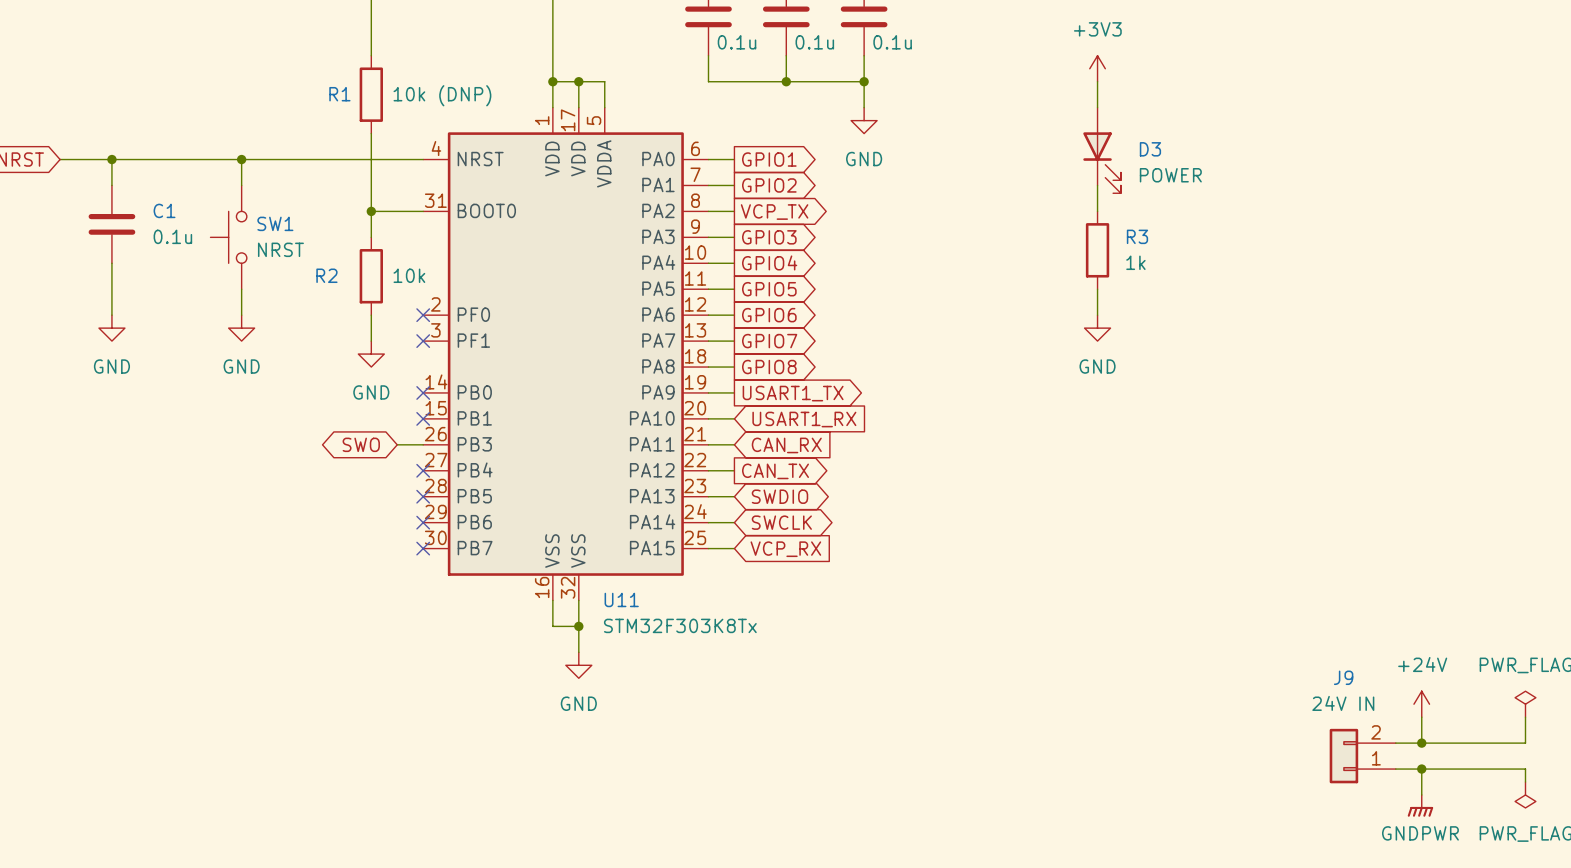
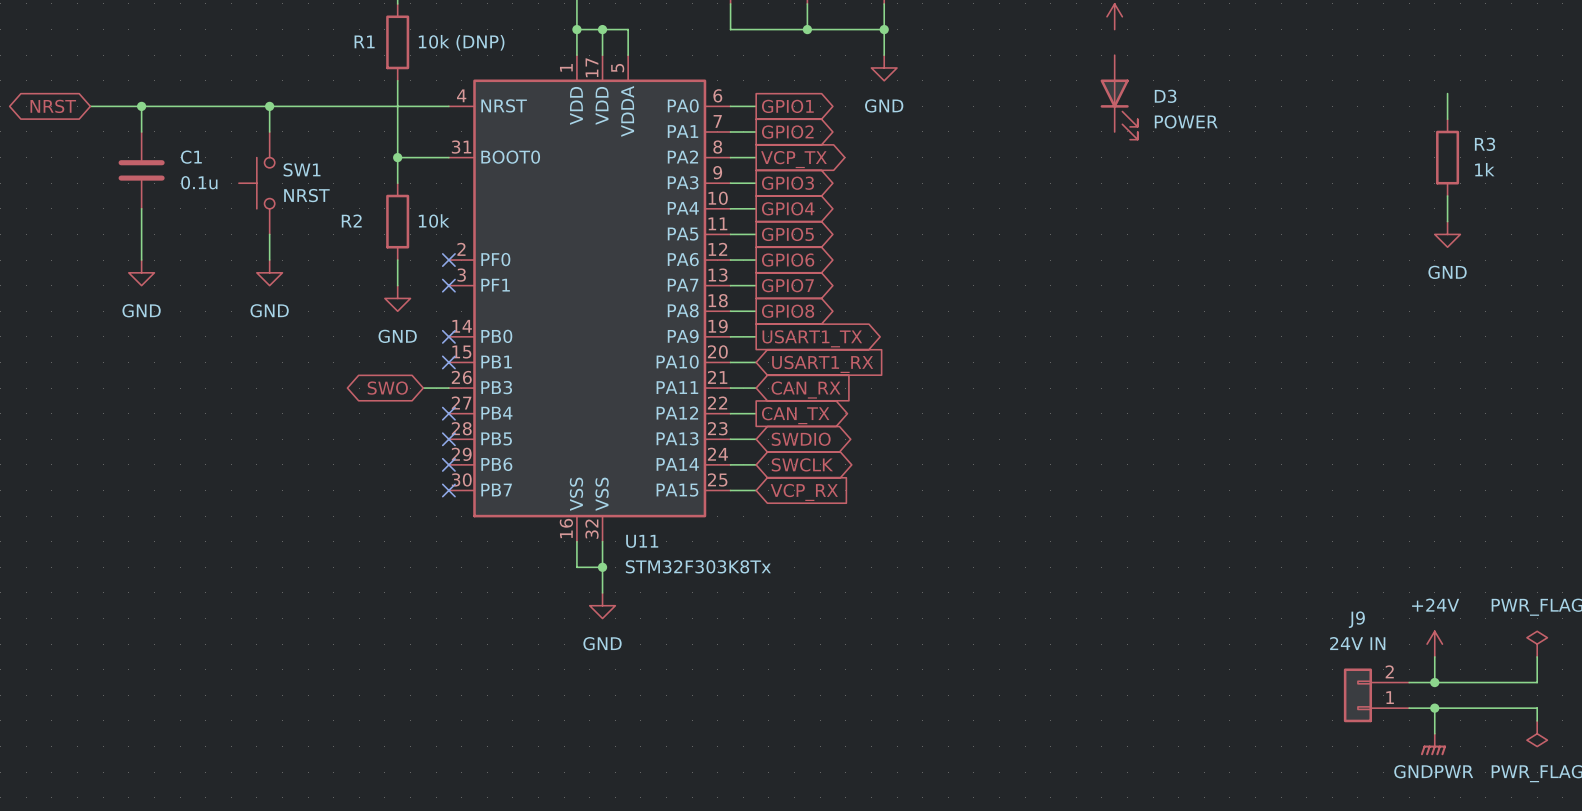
wire: (1097, 81) (1097, 107) -> none
wire: none -> (1447, 93) (1447, 119)
wire: (1097, 185) (1097, 211) -> none
R3 position: (1097, 250) -> (1447, 157)
wire: none -> (1447, 196) (1447, 221)
wire: (1097, 289) (1097, 315) -> none
power symbol: none -> GND (1447, 234)
power symbol: GND (1097, 328) -> none

